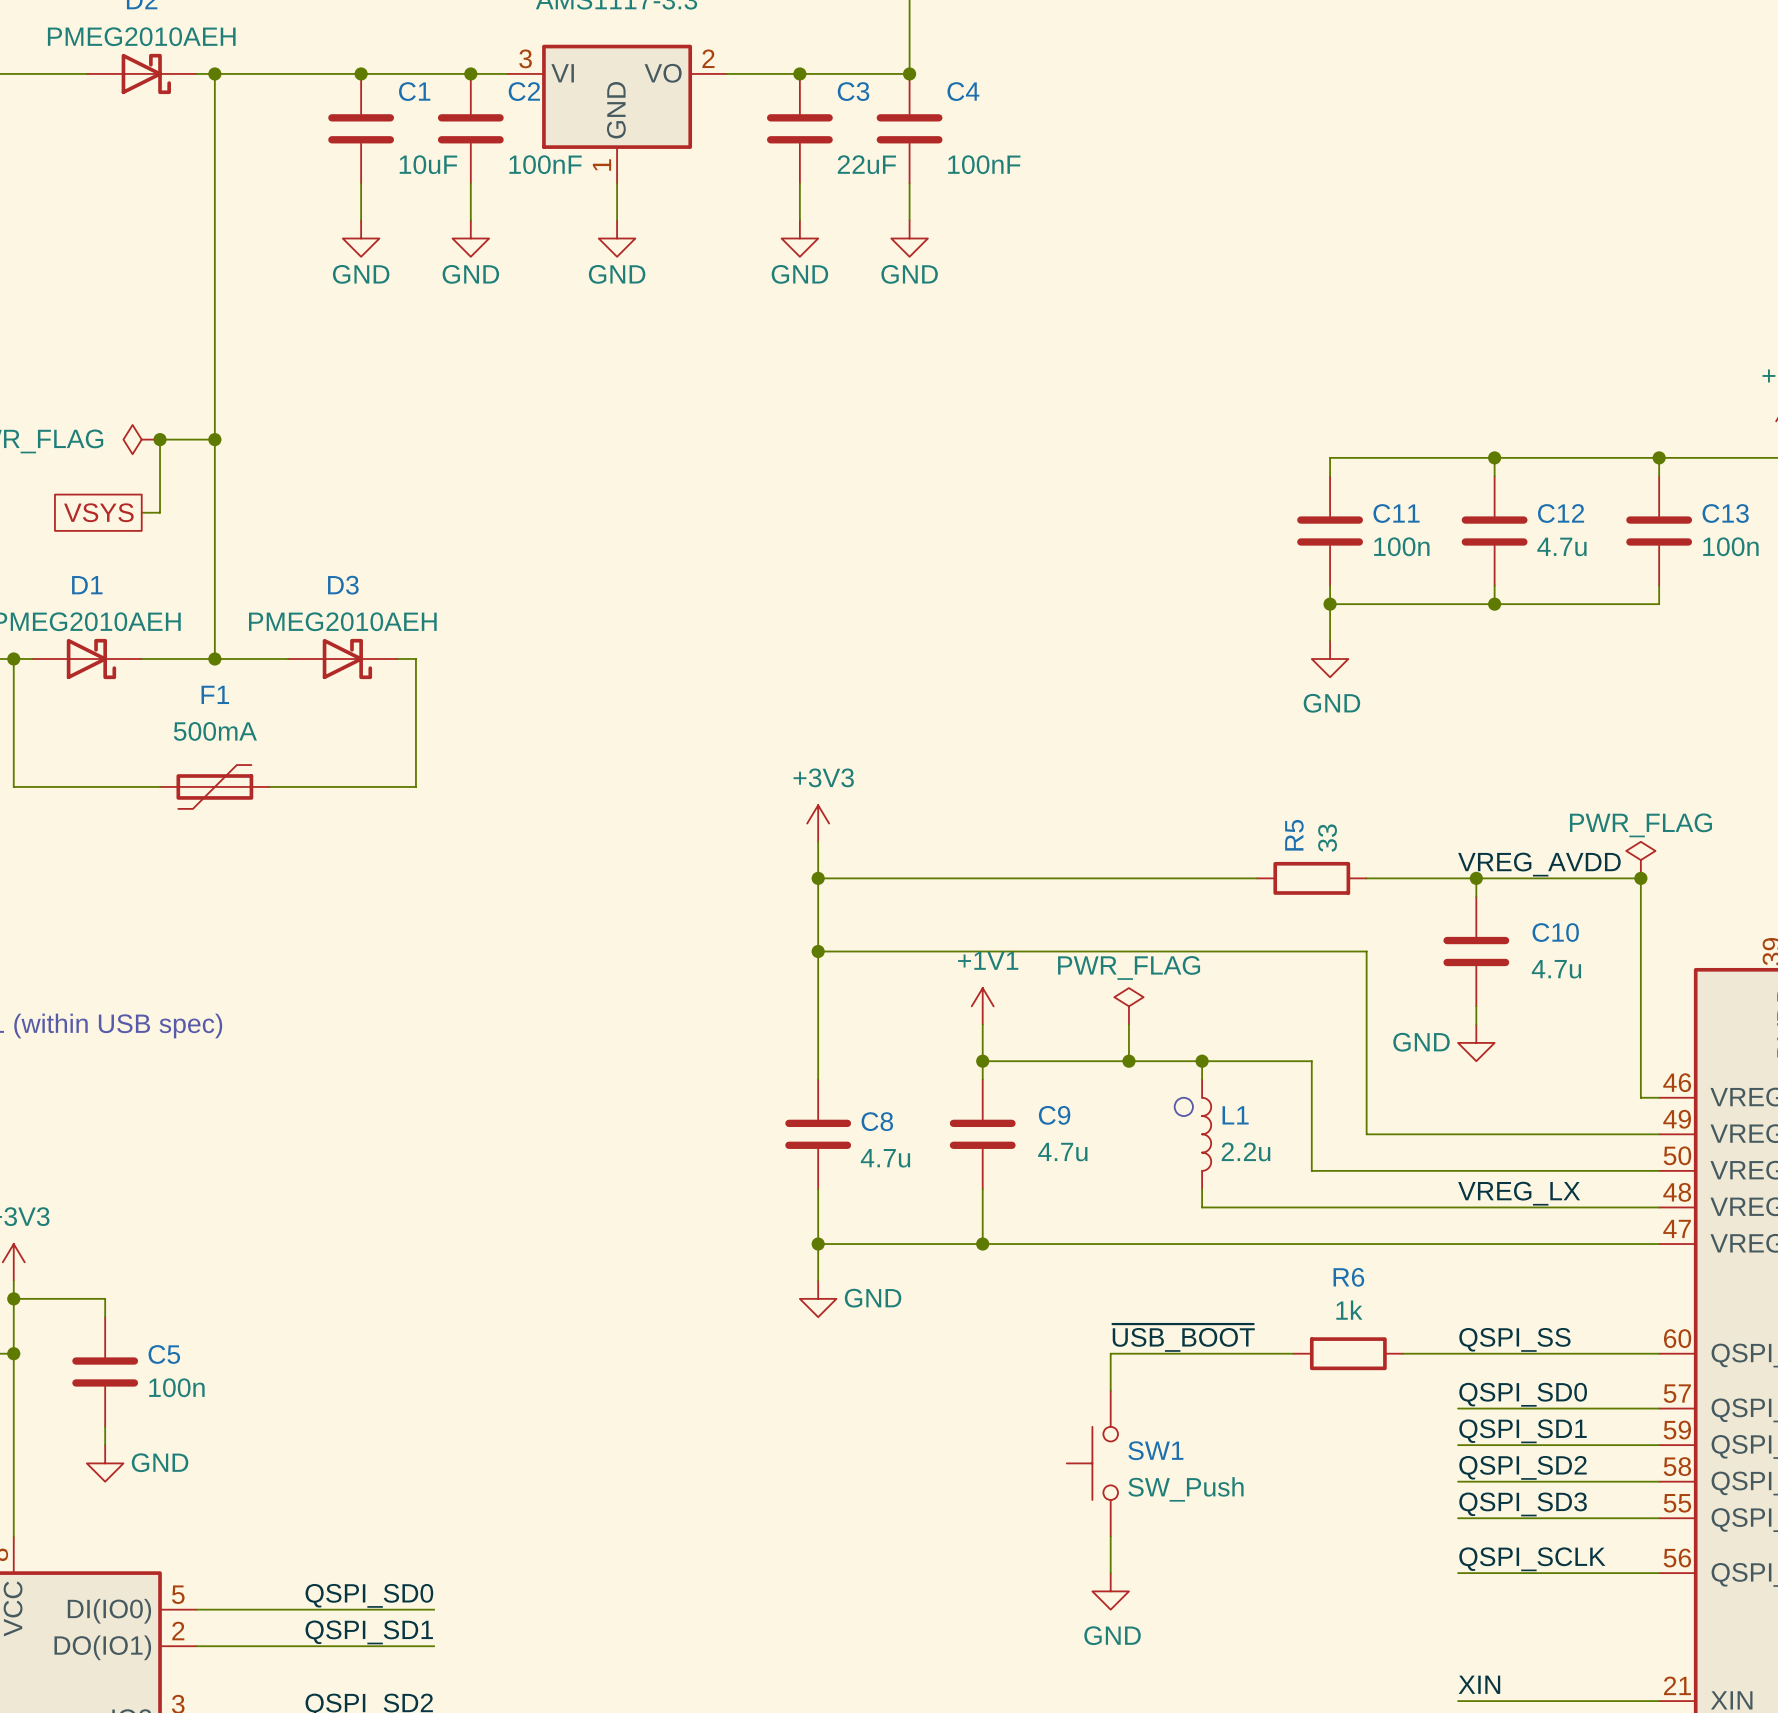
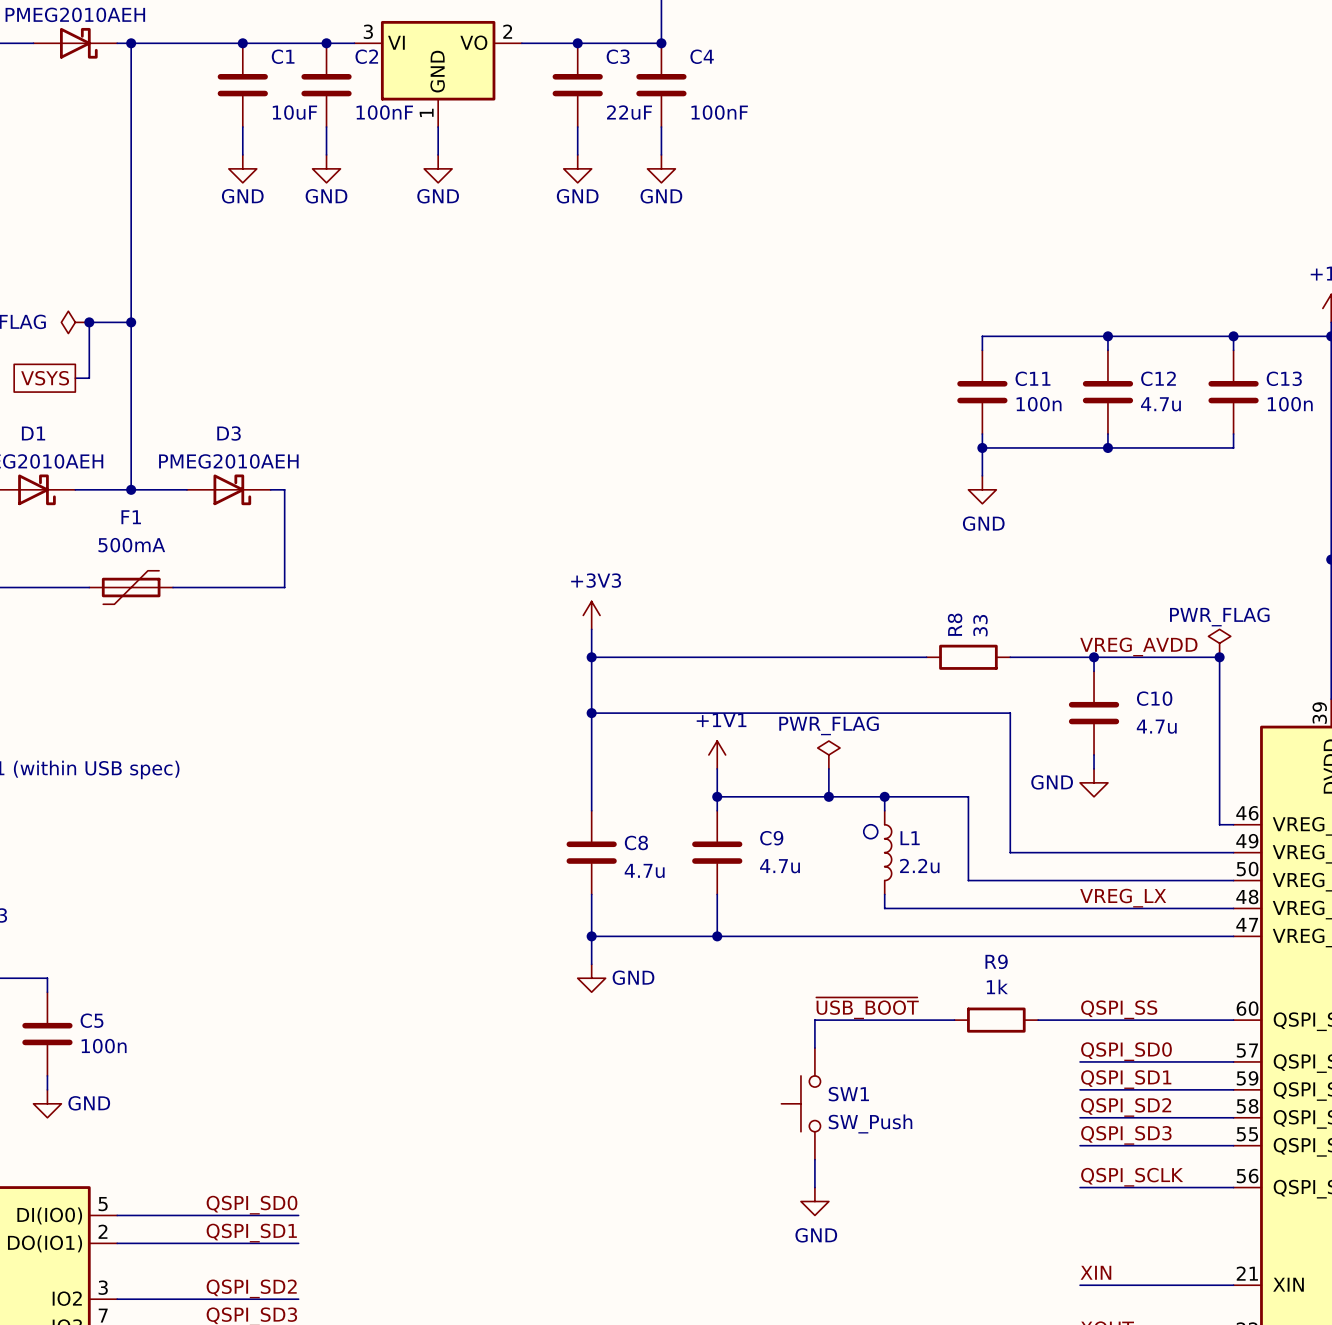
R5 name: R5 (1294, 835) -> R8 (955, 624)
R6 name: R6 (1348, 1277) -> R9 (996, 961)

